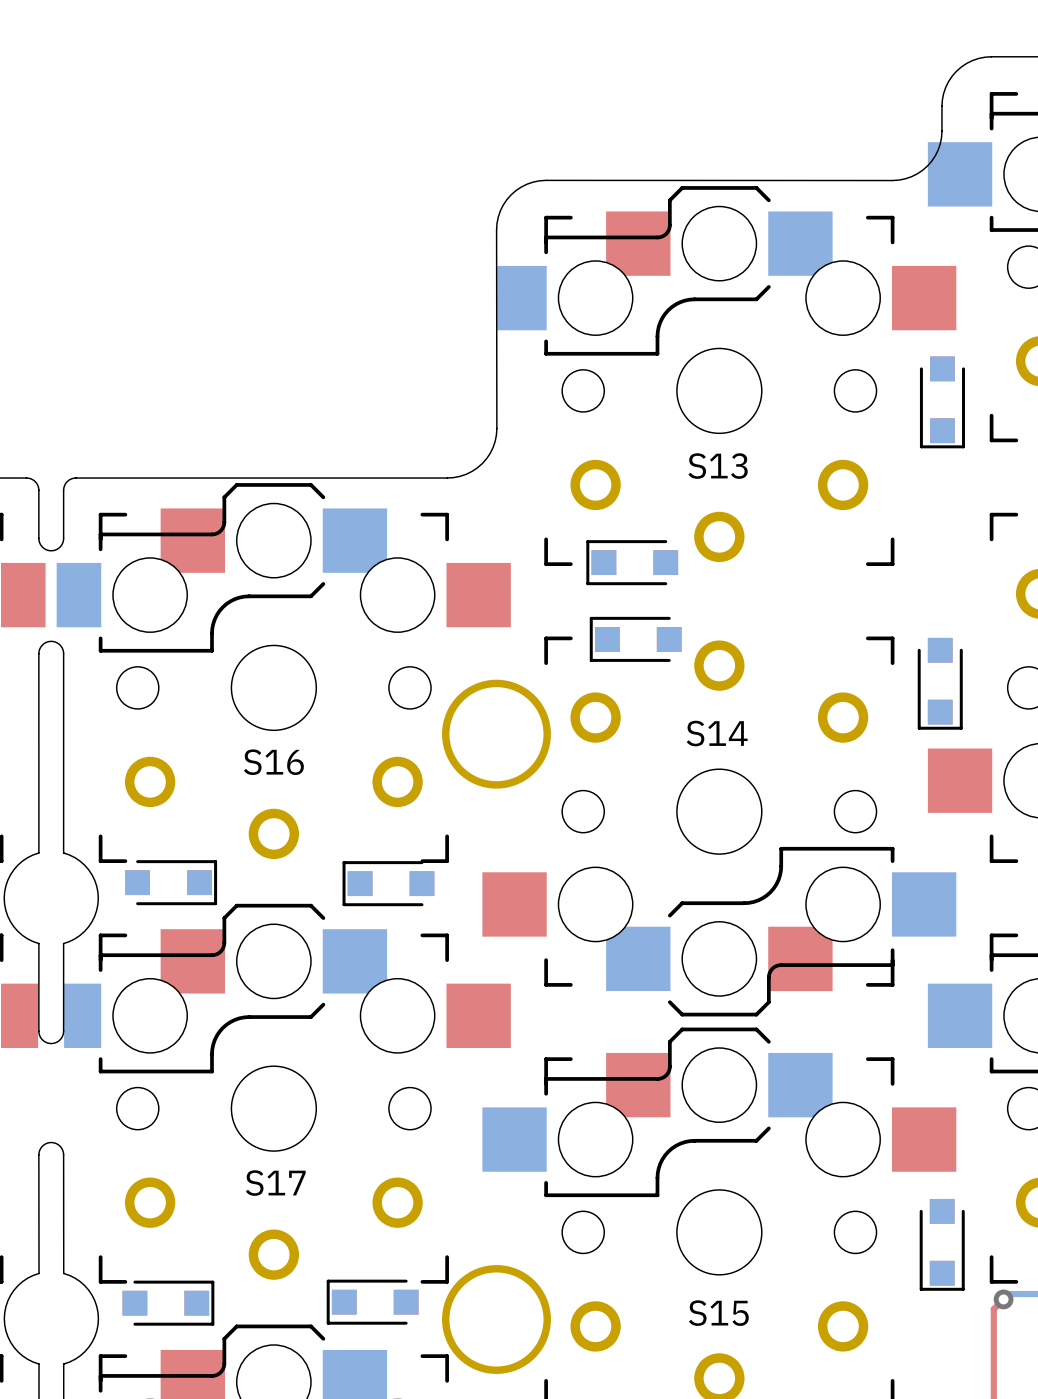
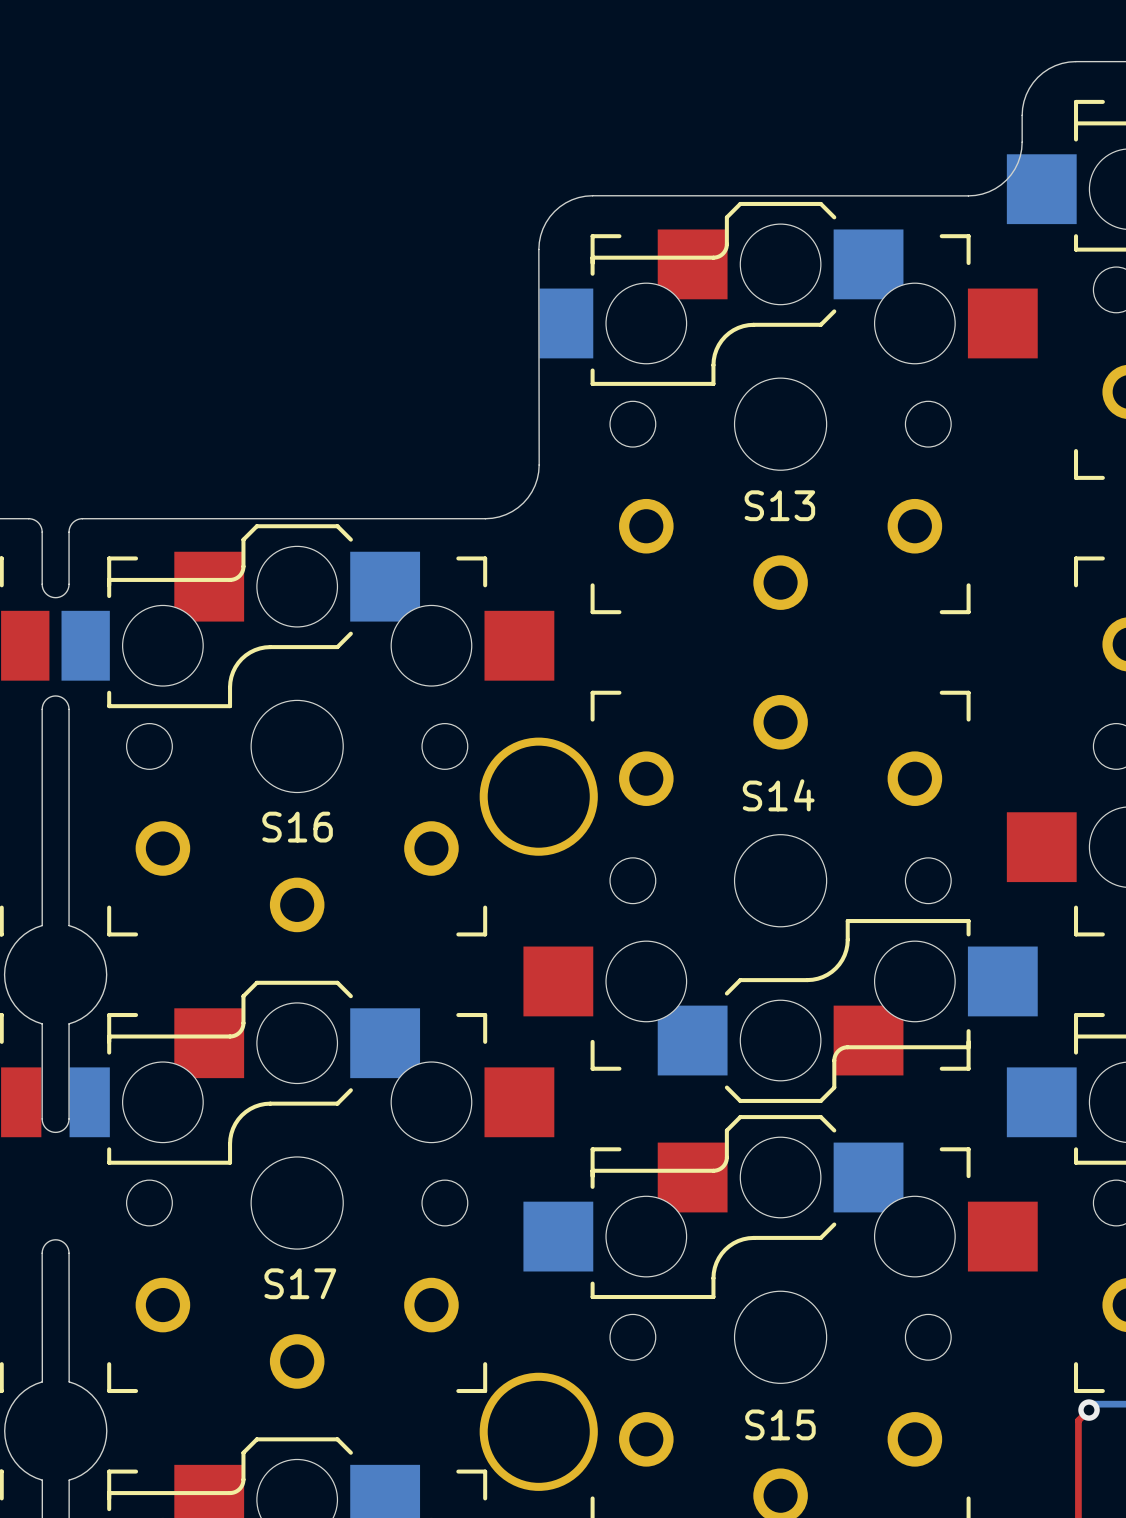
part: (942, 402) -> none
part: (632, 562) -> none
part: (635, 639) -> none
part: (940, 683) -> none
part: (171, 882) -> none
part: (388, 883) -> none
part: (942, 1244) -> none
part: (372, 1302) -> none
part: (168, 1303) -> none

